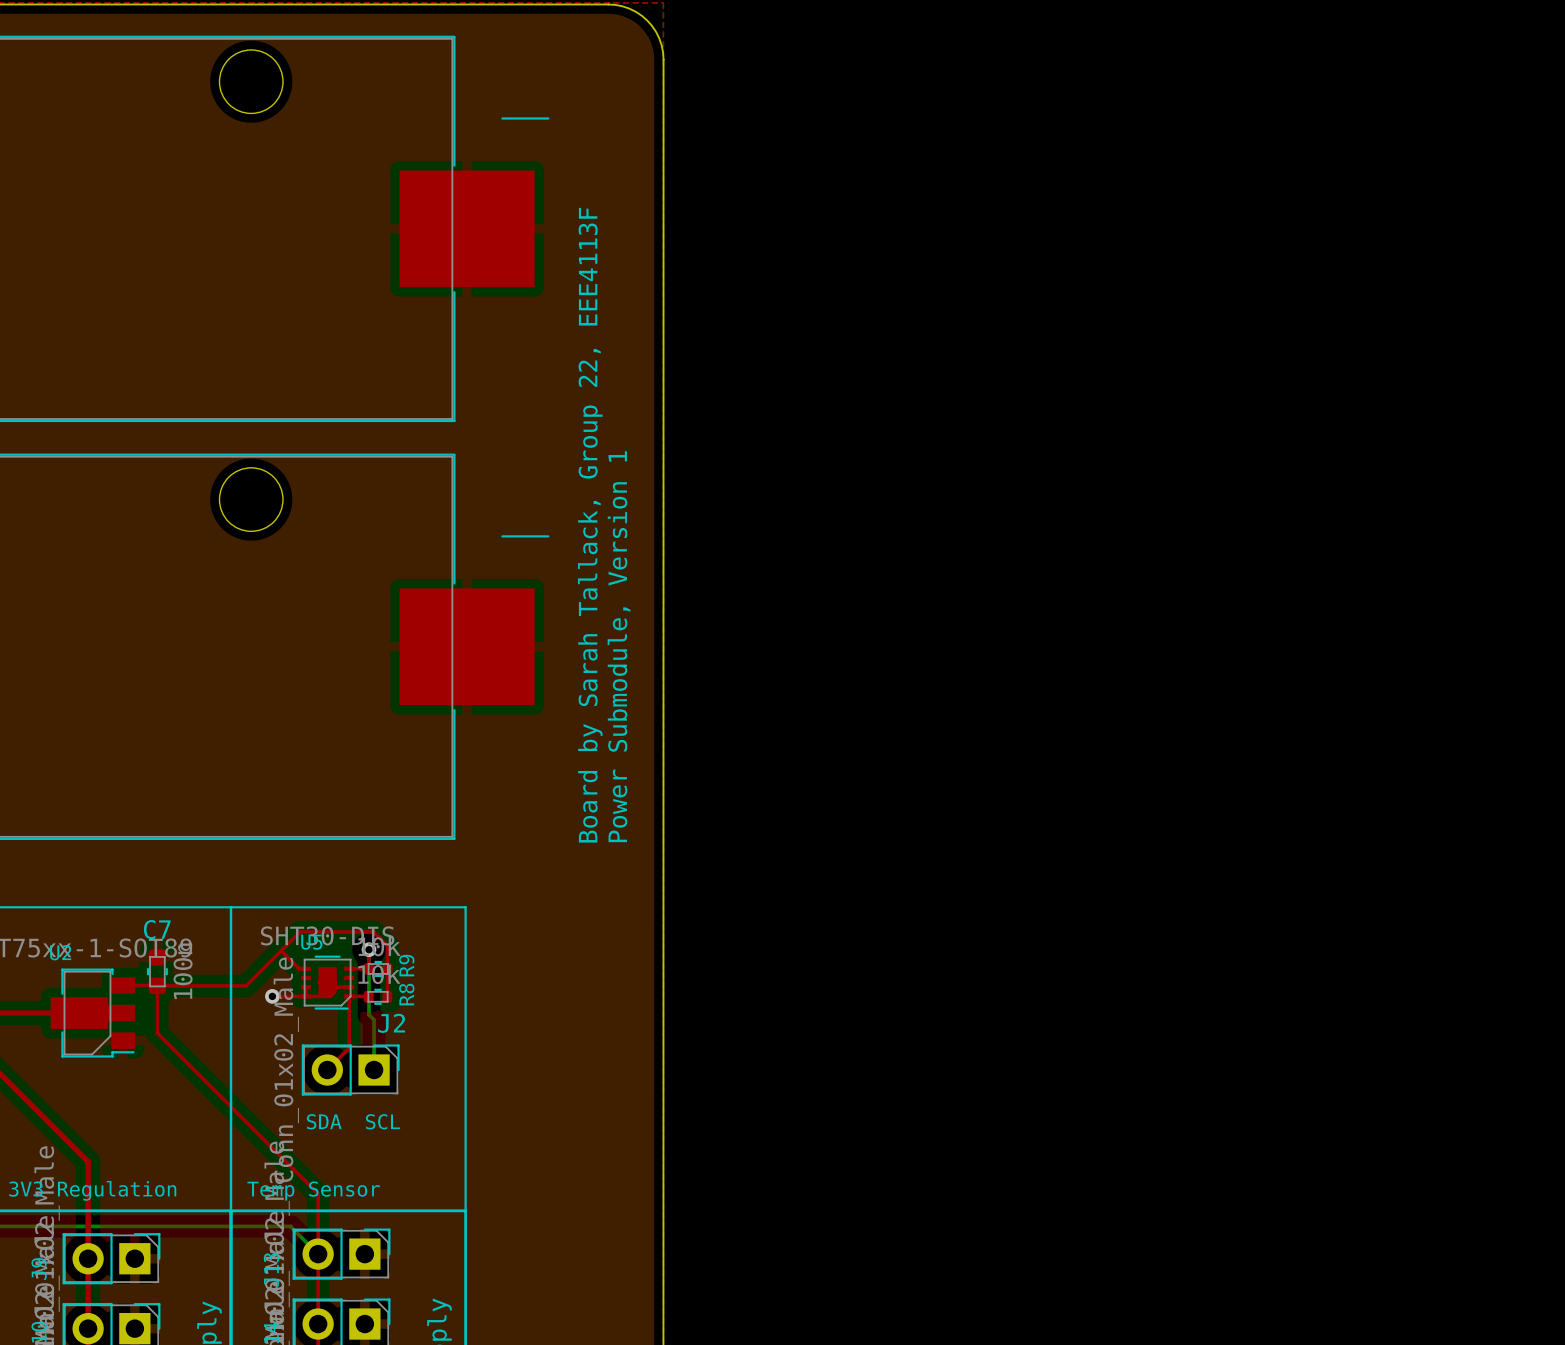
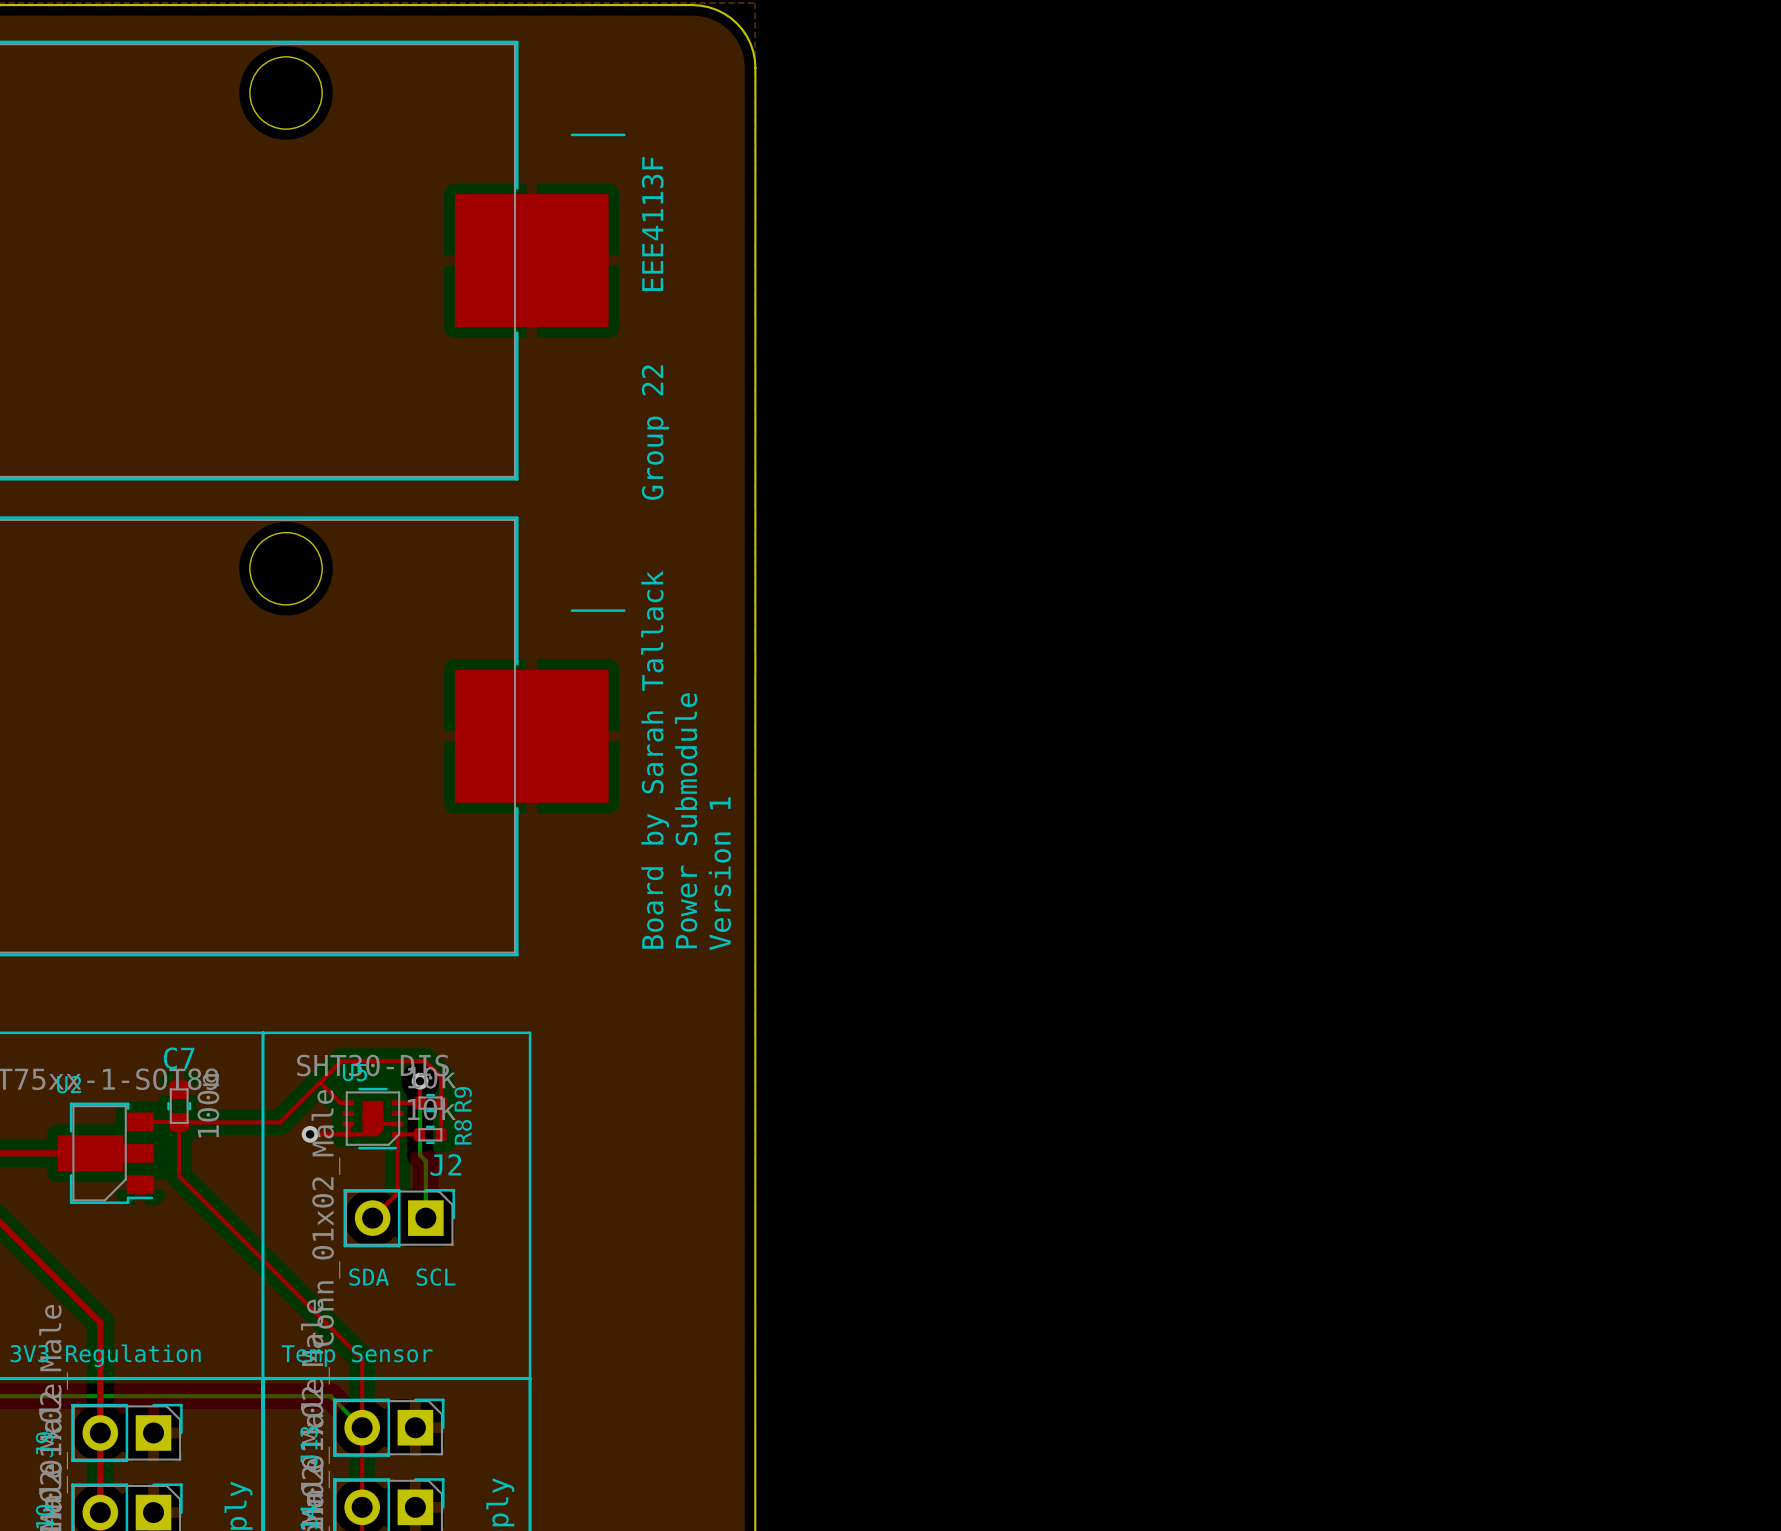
text: Board by Sarah Tallack, Group 22, EEE4113F (590, 525) -> Board by Sarah Tallack Group 22 EEE4113F (655, 552)
text: Power Submodule, Version 1 (619, 646) -> Power Submodule (686, 820)
text: none -> Version 1 (719, 873)

